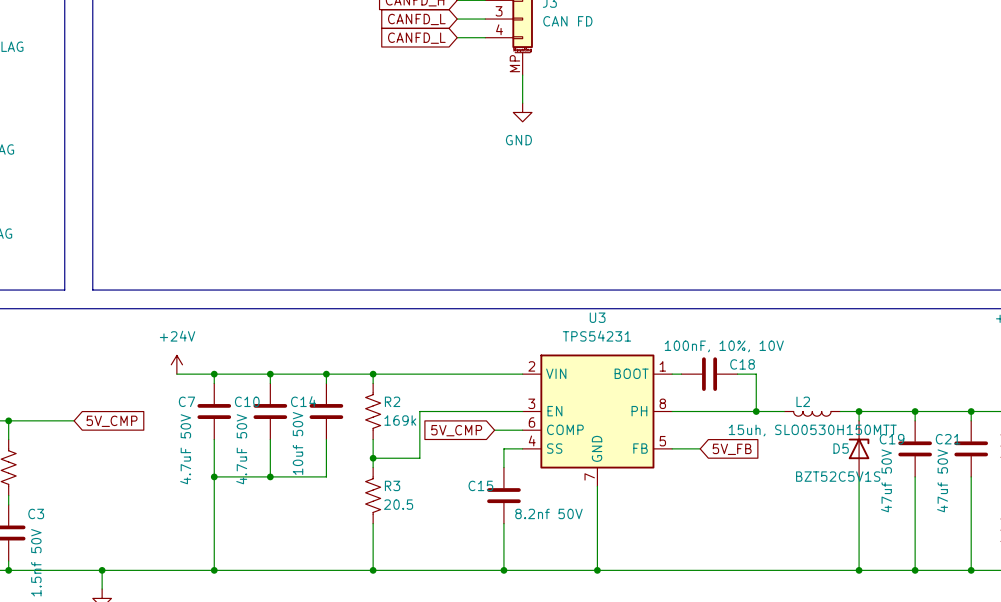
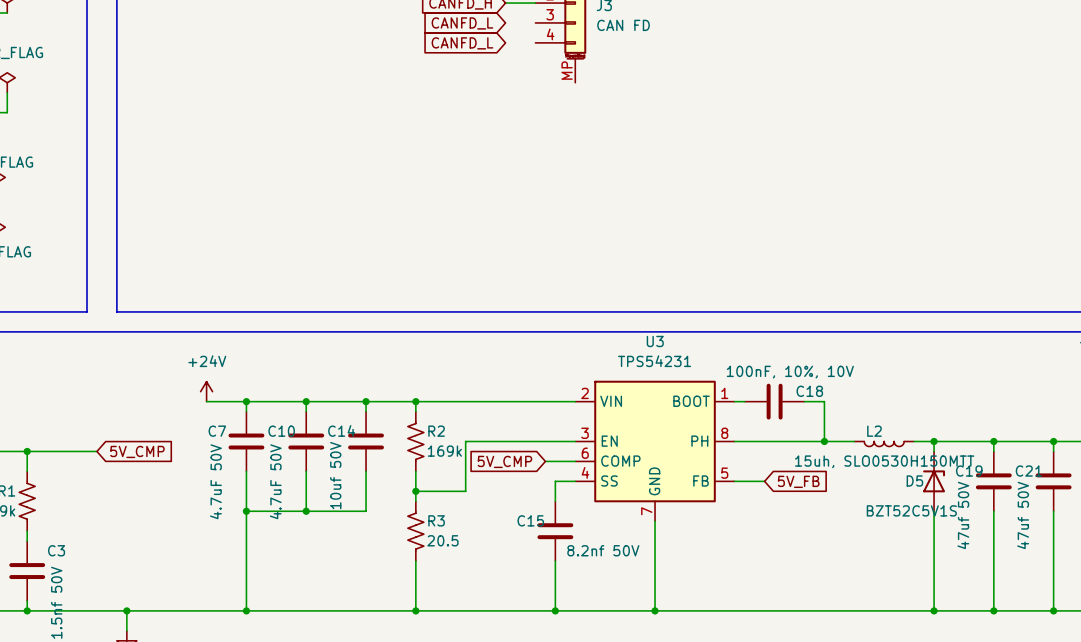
wire: (457, 19) (485, 19) -> none
wire: (457, 37) (485, 37) -> none
wire: (522, 75) (522, 103) -> none
power symbol: GND (522, 112) -> none

